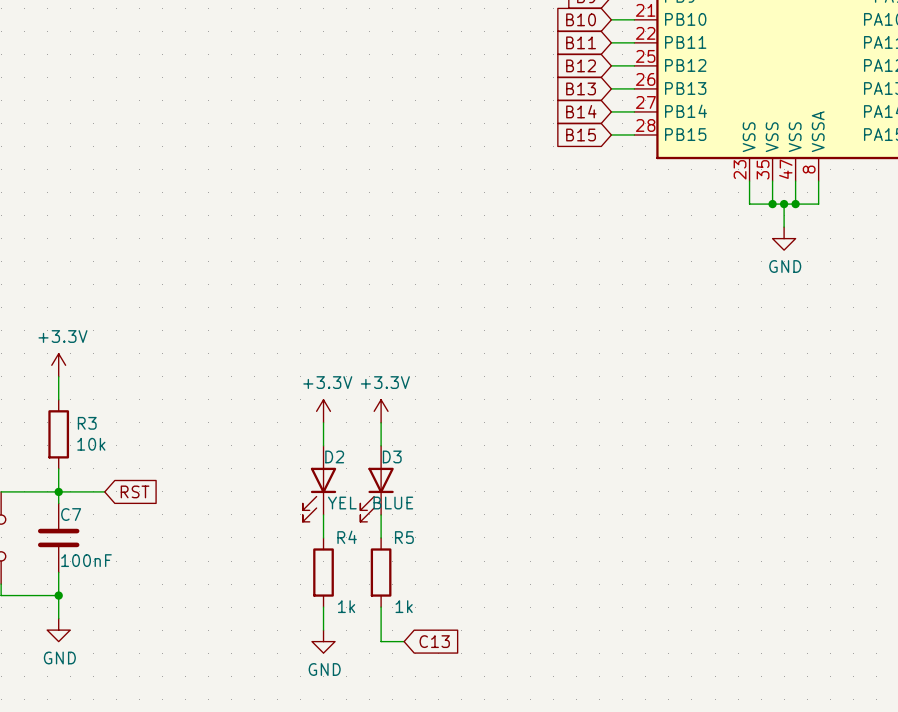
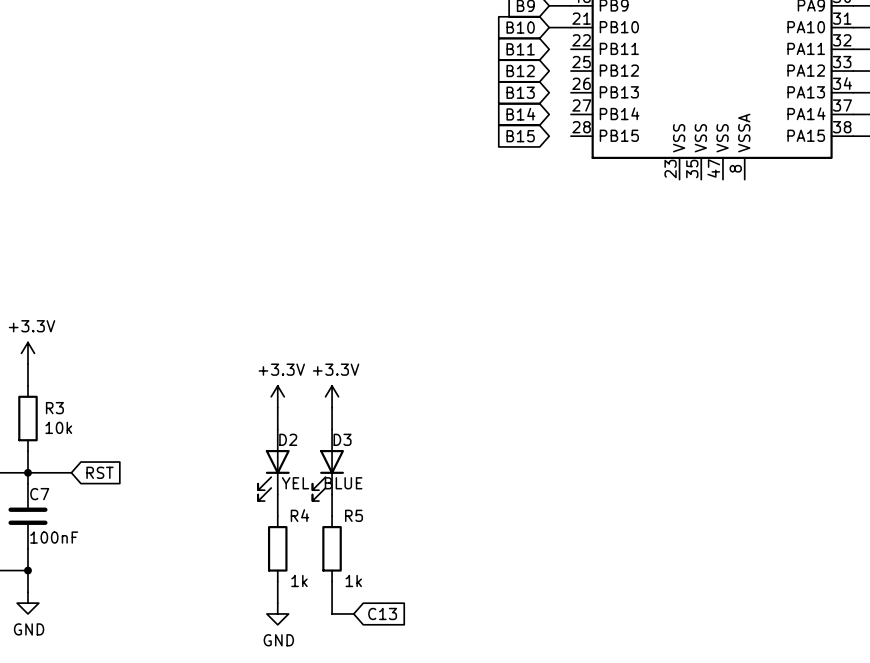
wire: (611, 42) (634, 42) -> none
wire: (611, 65) (634, 65) -> none
wire: (611, 88) (634, 88) -> none
wire: (611, 111) (634, 111) -> none
wire: (611, 134) (634, 134) -> none
wire: (749, 181) (749, 204) (818, 204) (818, 181) -> none
wire: (772, 181) (772, 204) -> none
wire: (795, 181) (795, 204) -> none
junction: (772, 204) -> none
wire: (784, 204) (784, 227) -> none
junction: (784, 204) -> none
junction: (795, 204) -> none
power symbol: GND (784, 238) -> none

